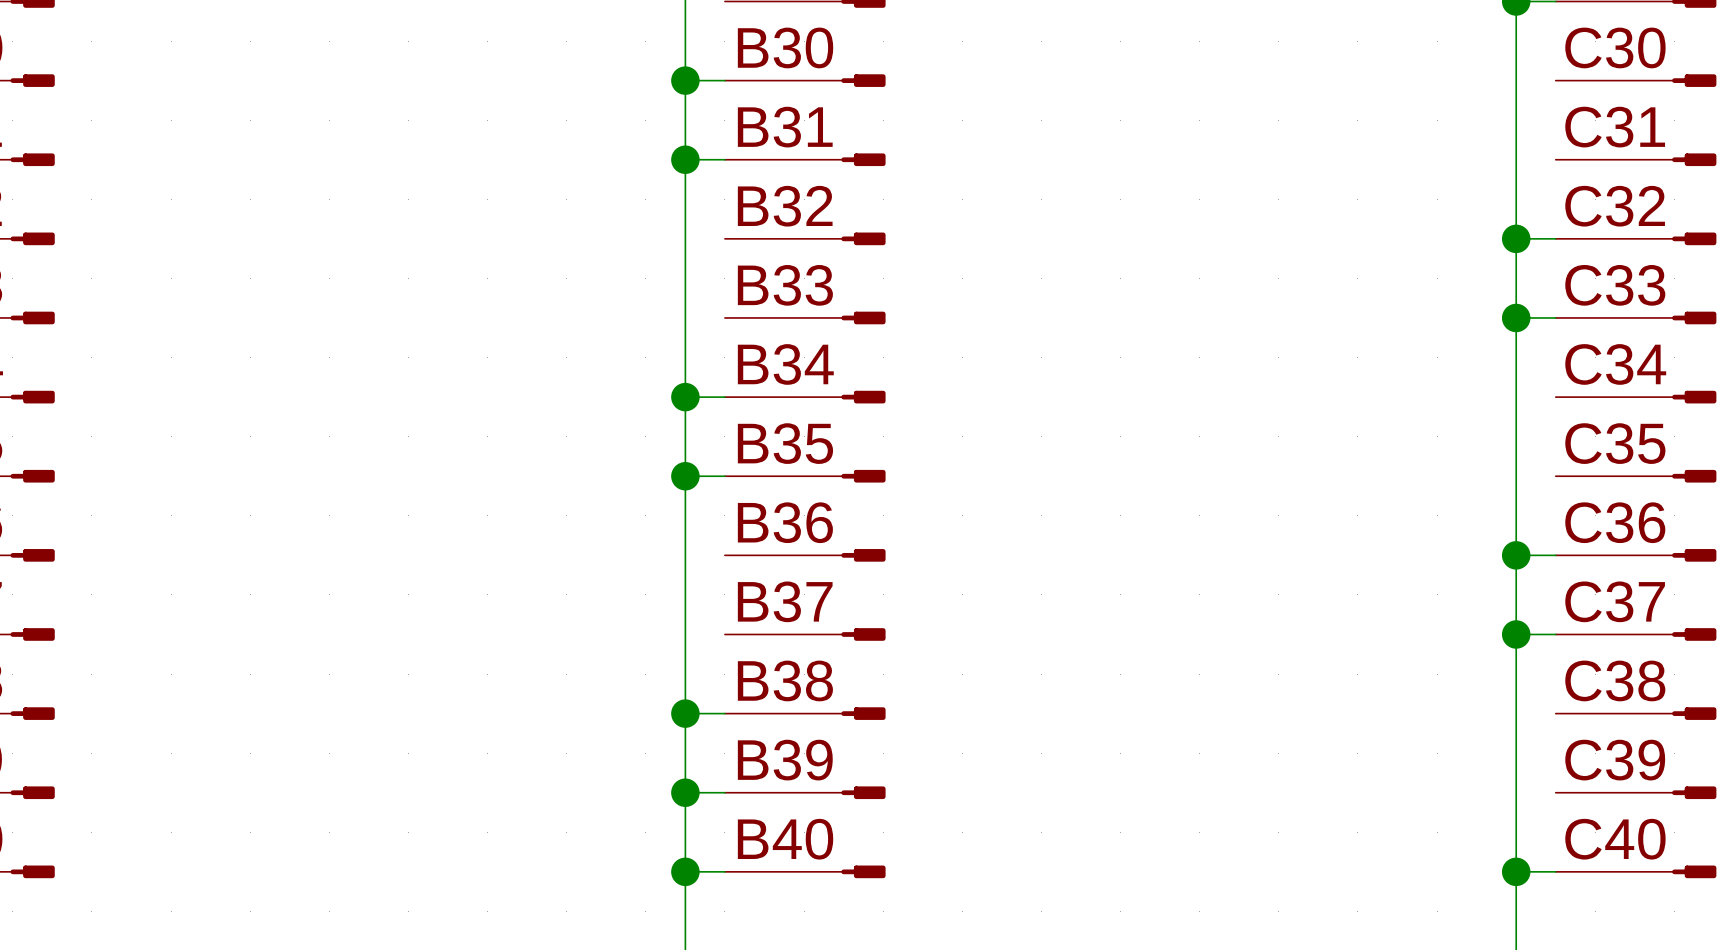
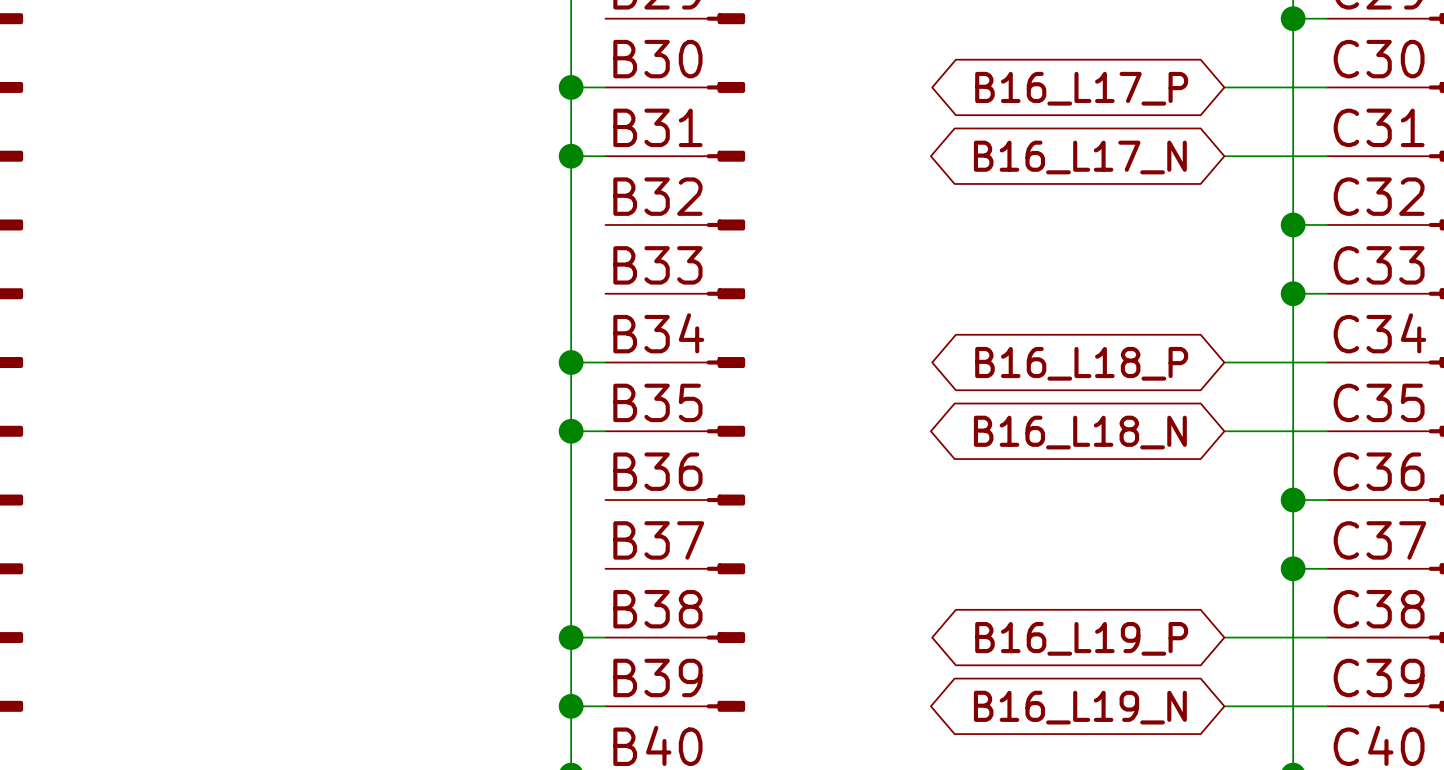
wire: none -> (1224, 87) (1327, 87)
global label: none -> B16_L17_P (1081, 88)
wire: none -> (1224, 156) (1327, 156)
global label: none -> B16_L17_N (1080, 157)
wire: none -> (1224, 362) (1327, 362)
global label: none -> B16_L18_P (1081, 363)
wire: none -> (1224, 431) (1327, 431)
global label: none -> B16_L18_N (1080, 432)
wire: none -> (1224, 637) (1327, 637)
global label: none -> B16_L19_P (1081, 638)
wire: none -> (1224, 706) (1327, 706)
global label: none -> B16_L19_N (1080, 707)

